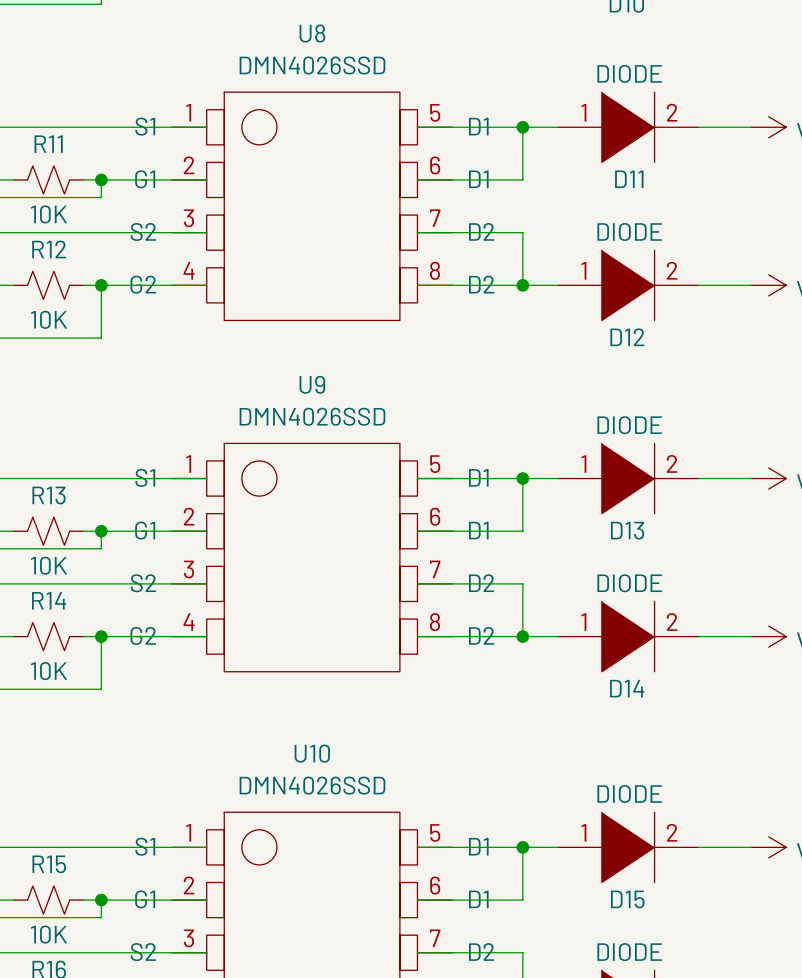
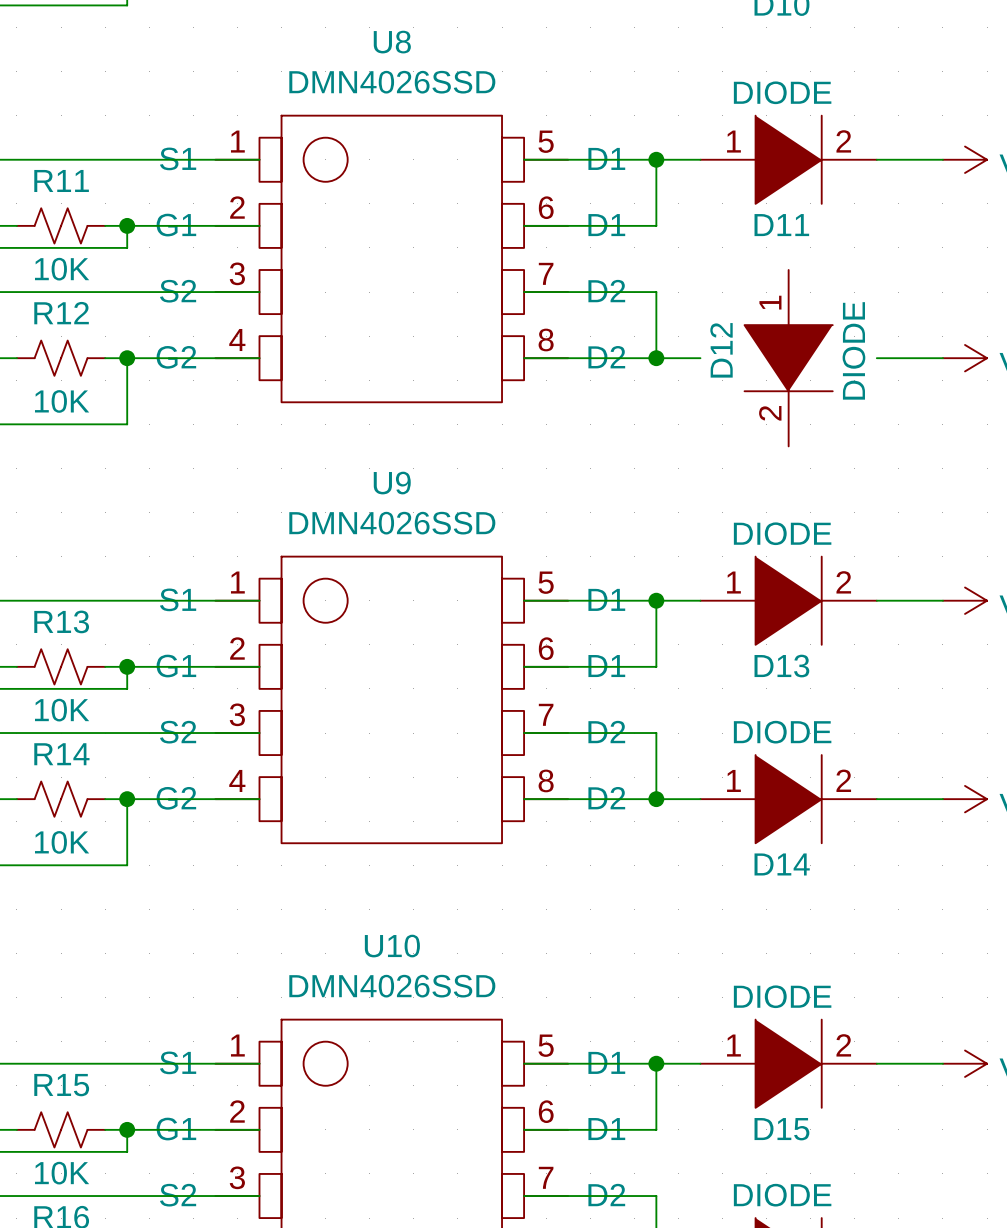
D12 rotation: 0° (628, 285) -> 90° clockwise (788, 358)

